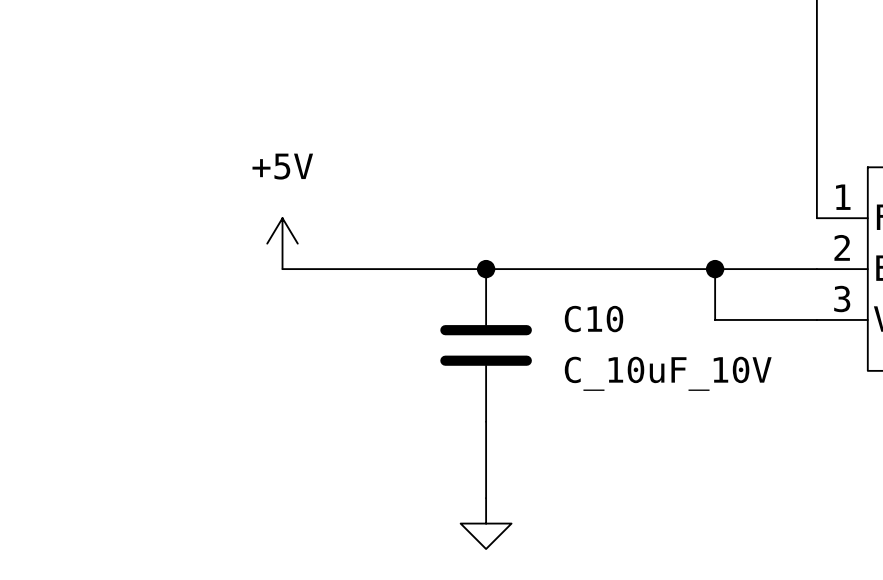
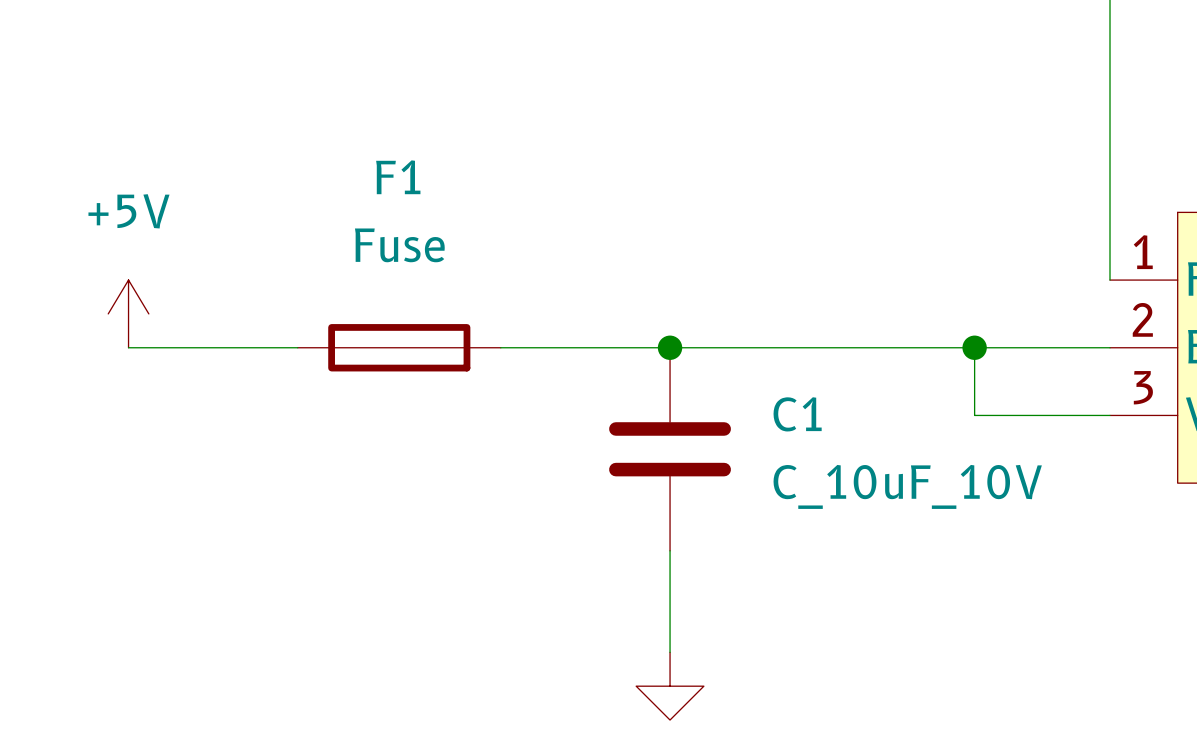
power symbol position: +5V (282, 243) -> +5V (128, 313)
wire: none -> (128, 347) (297, 347)
F1: none -> Fuse (399, 347)
C10 name: C10 (594, 319) -> C1 (797, 414)

